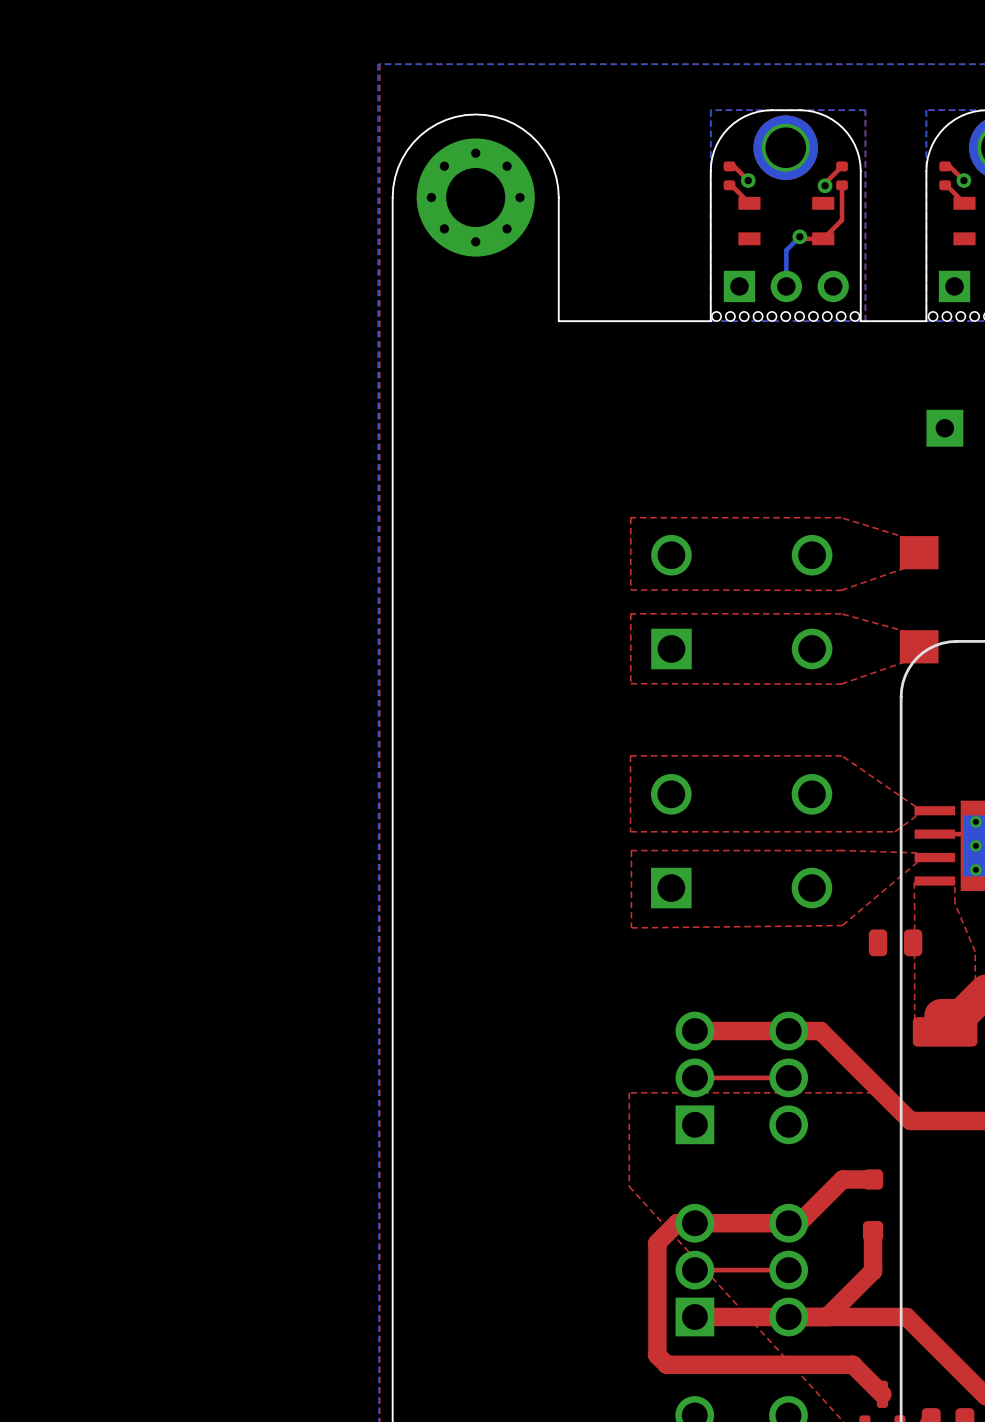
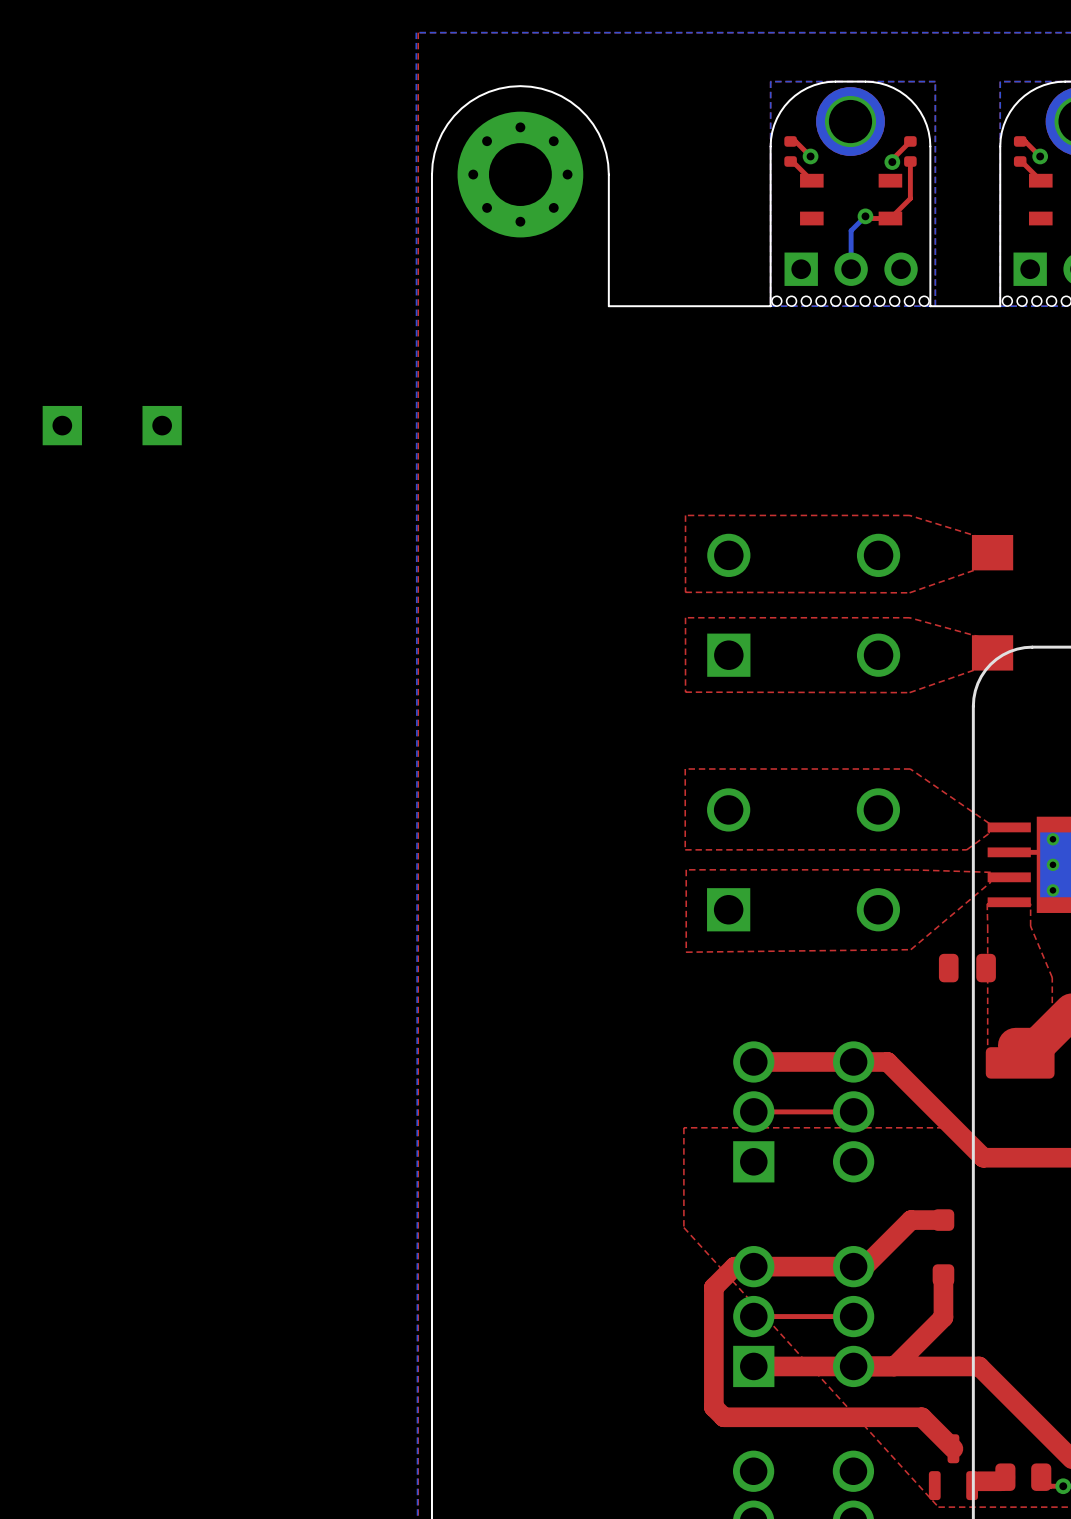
part: (944, 428) -> none
part: none -> (62, 425)
part: none -> (162, 425)

